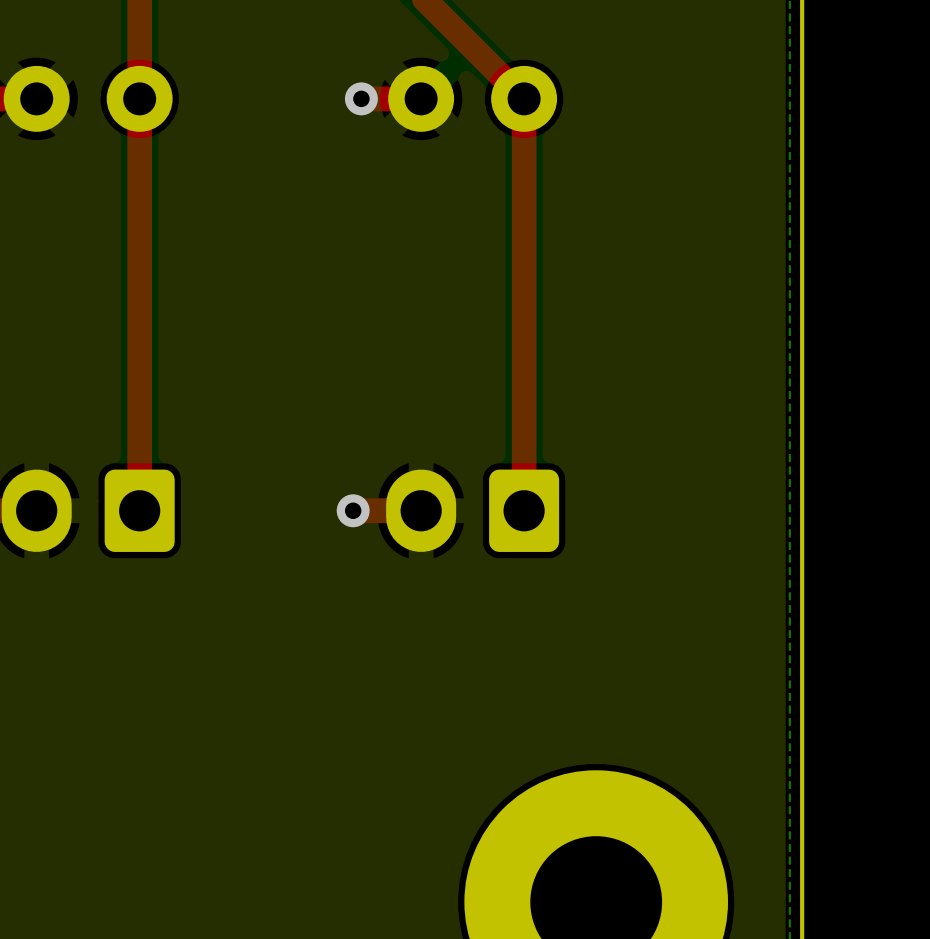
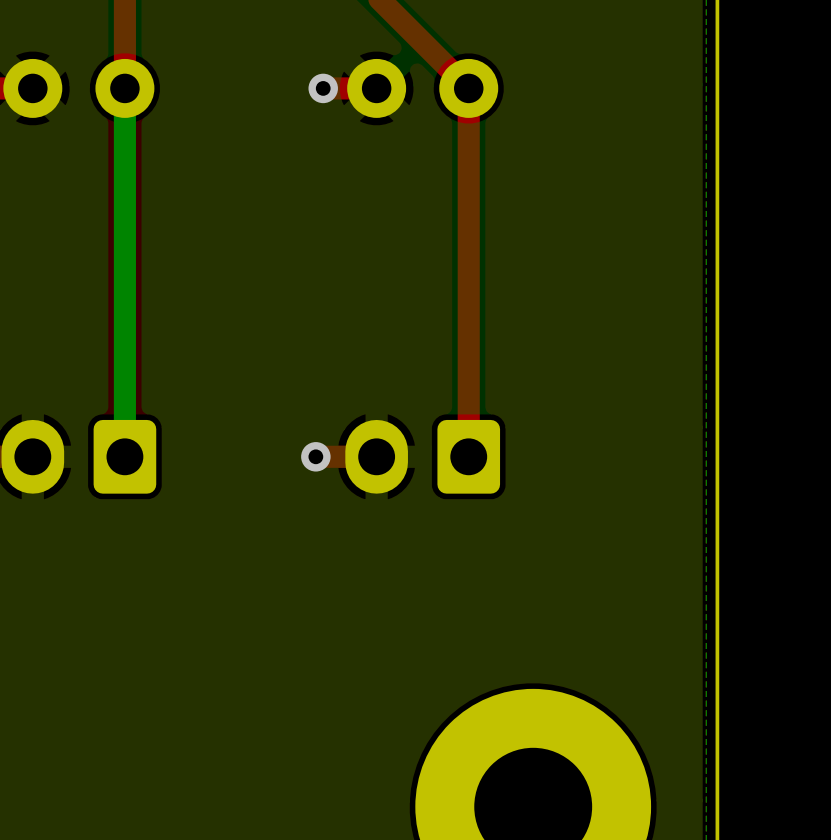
top track: (139, 98) (139, 510) -> none
bottom track: none -> (124, 88) (124, 456)

